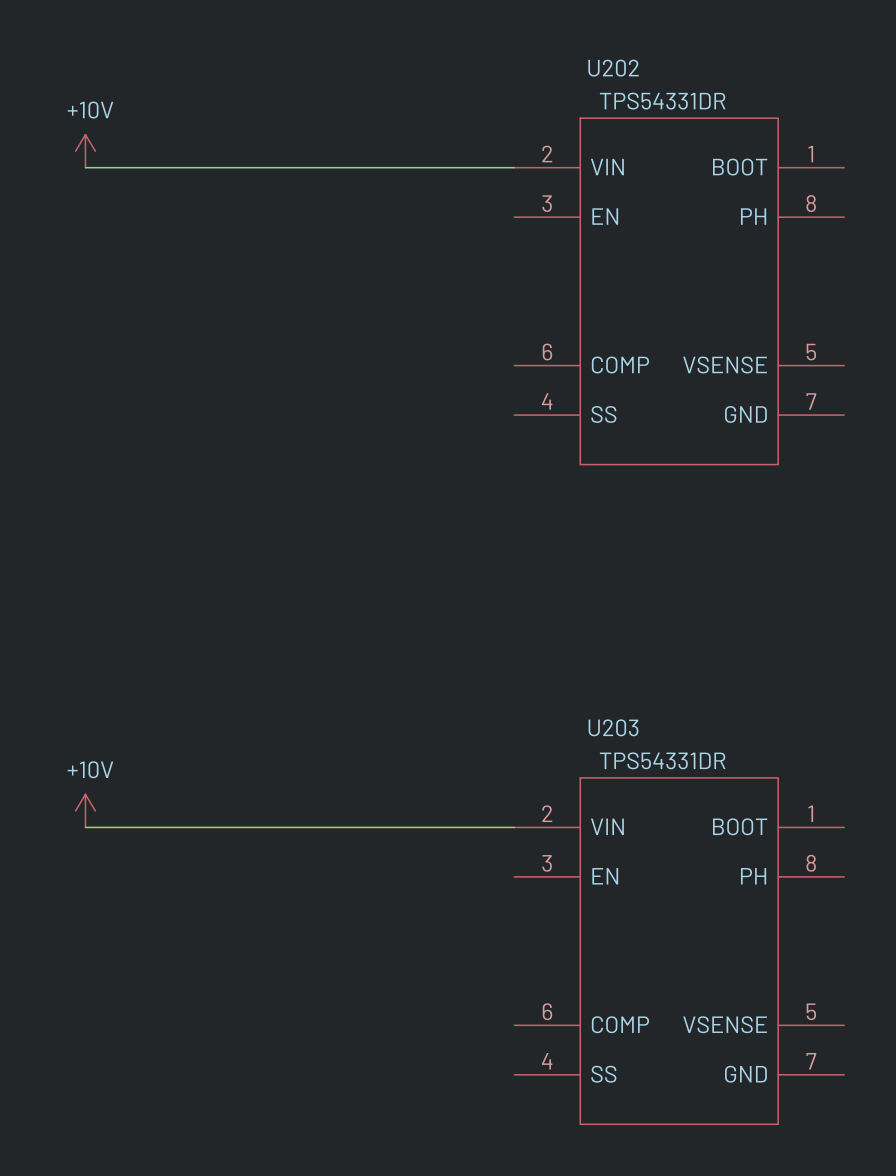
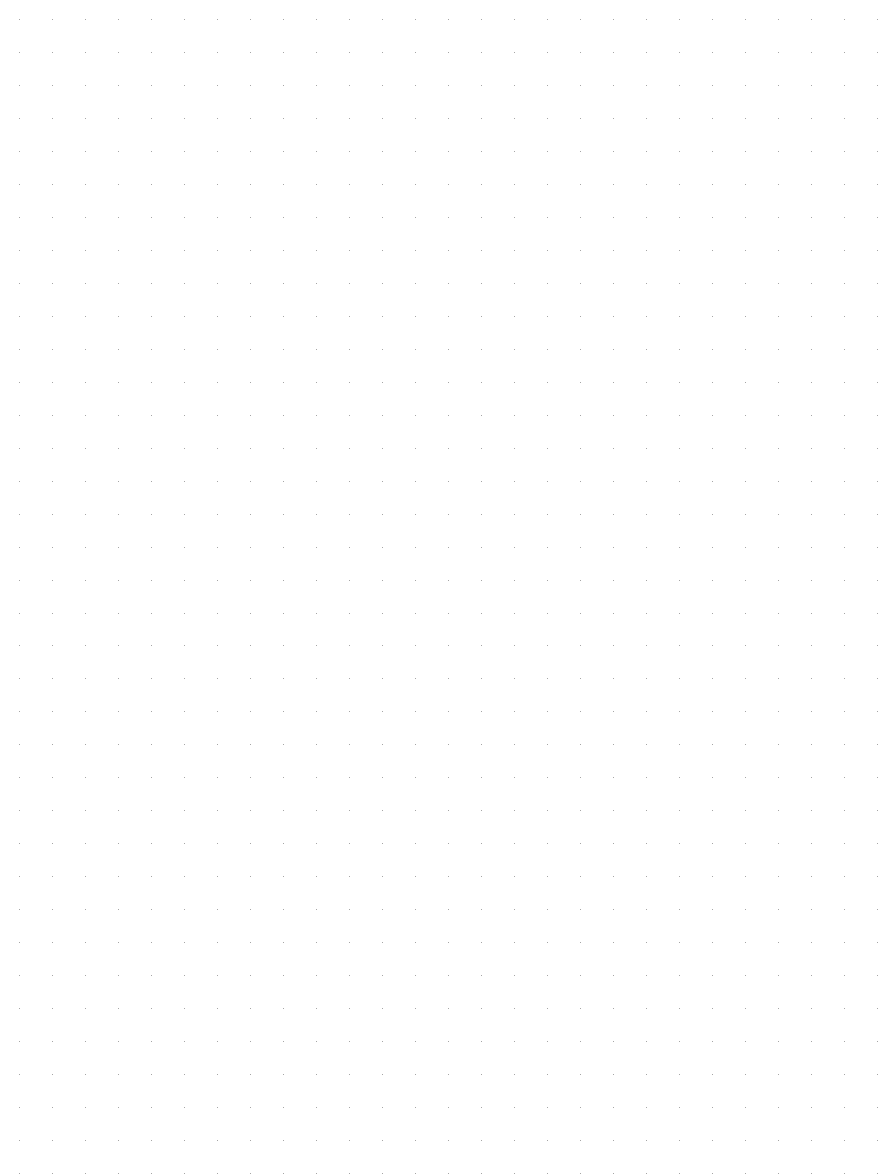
power symbol: +10V (85, 151) -> none
wire: (85, 167) (514, 167) -> none
U202: TPS54331DR (679, 291) -> none
power symbol: +10V (85, 810) -> none
wire: (85, 827) (514, 827) -> none
U203: TPS54331DR (679, 951) -> none

